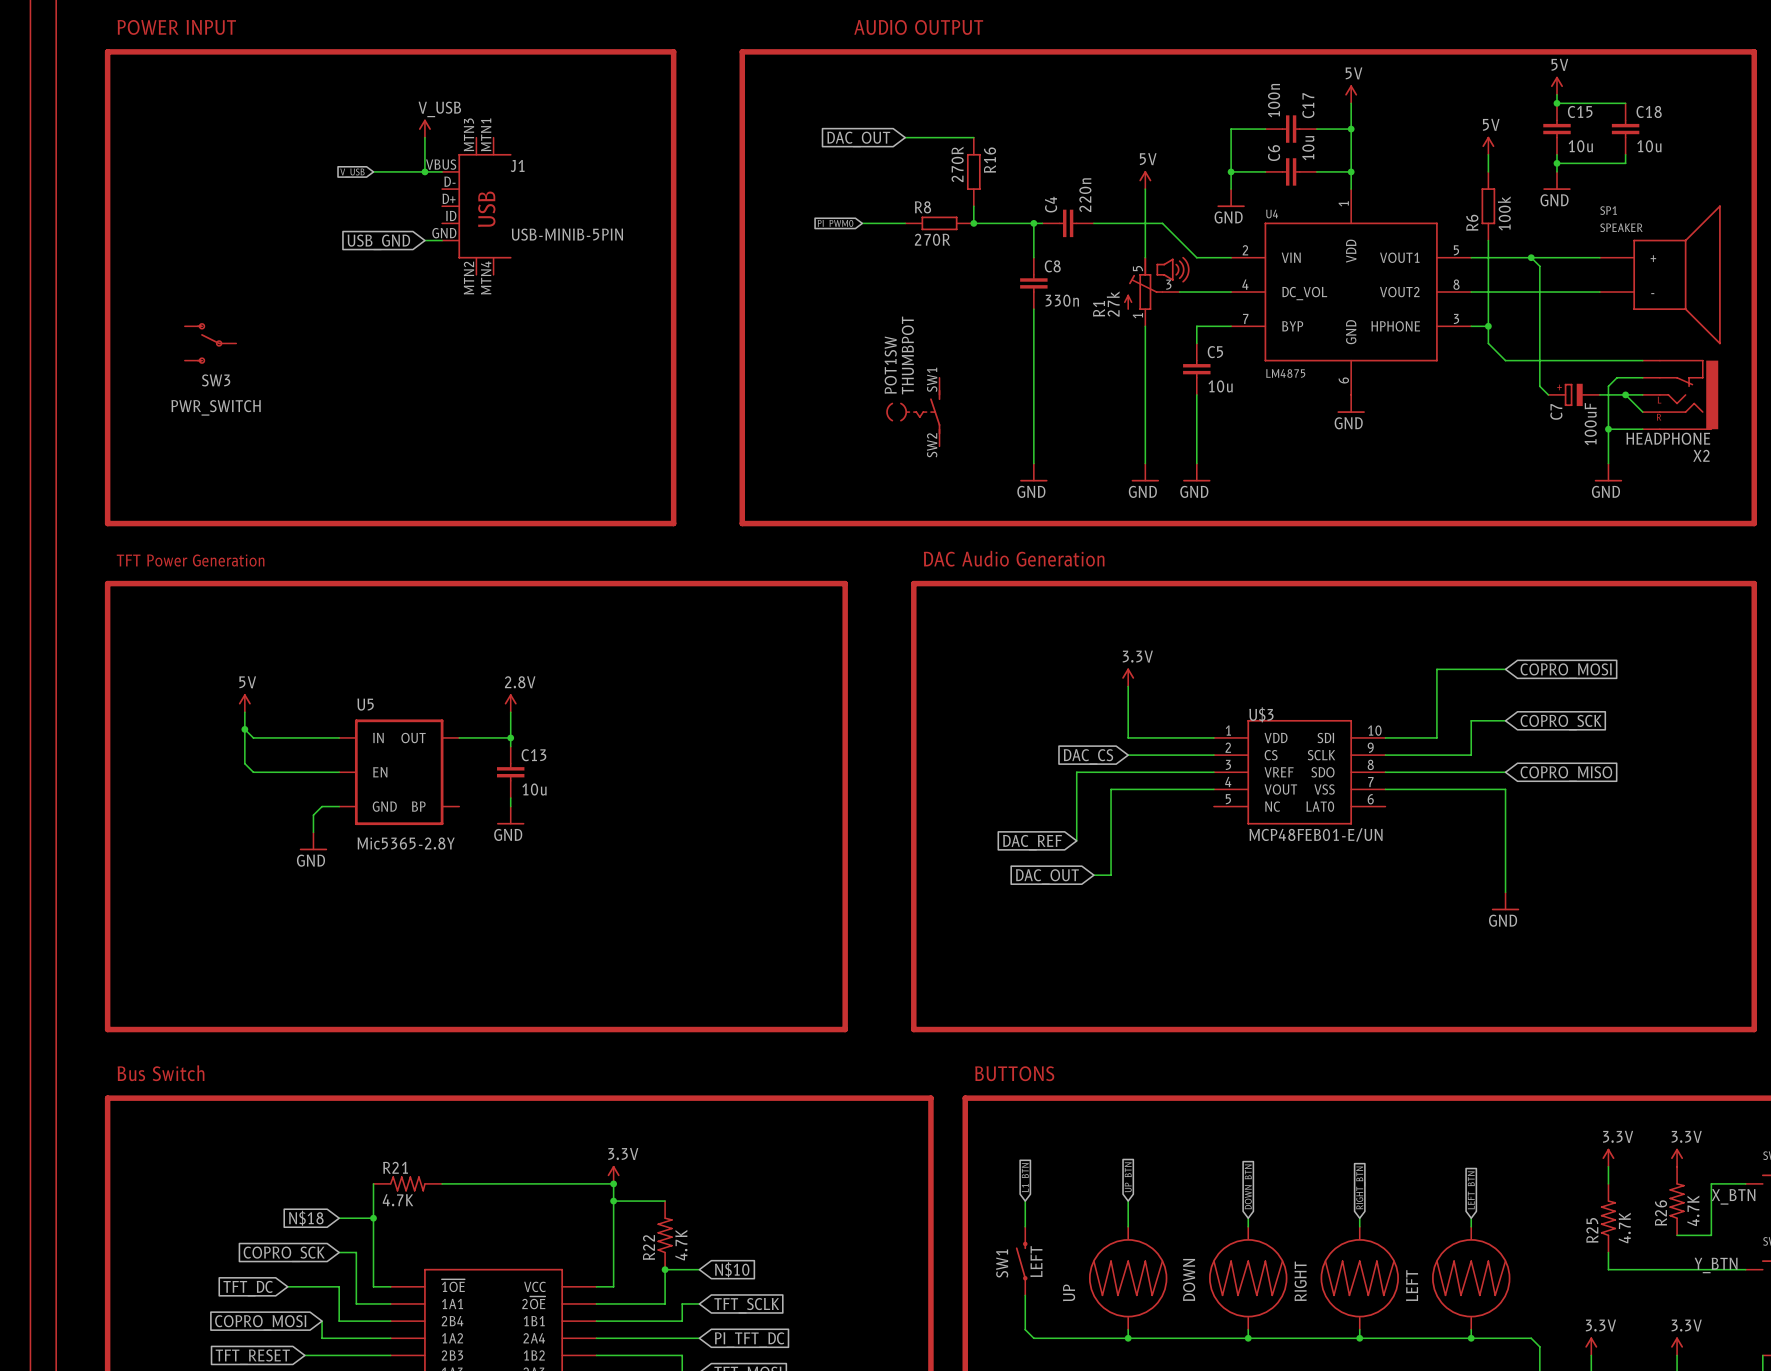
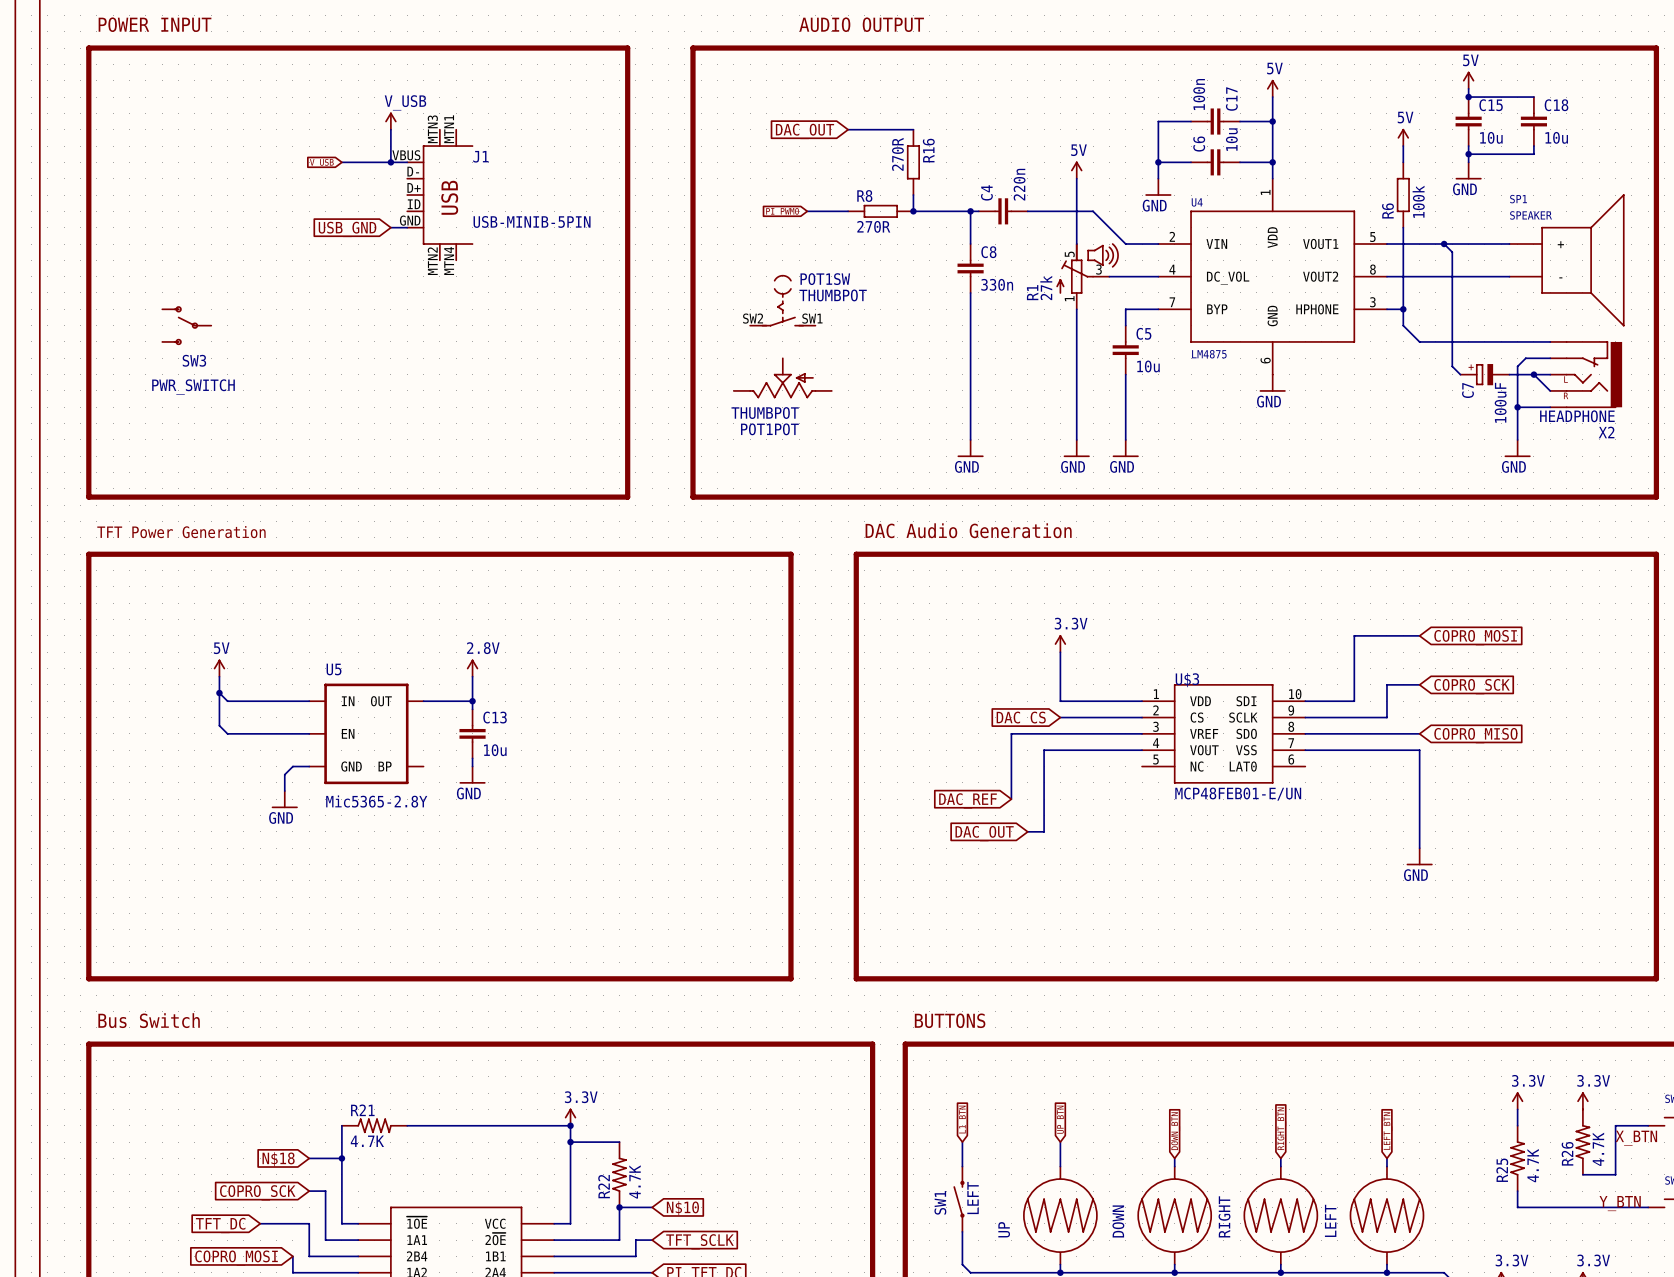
POT1POT: none -> THUMBPOT (782, 378)
POT1SW rotation: 0° (913, 412) -> 90° clockwise (782, 300)
POT1SW position: (913, 412) -> (782, 300)

